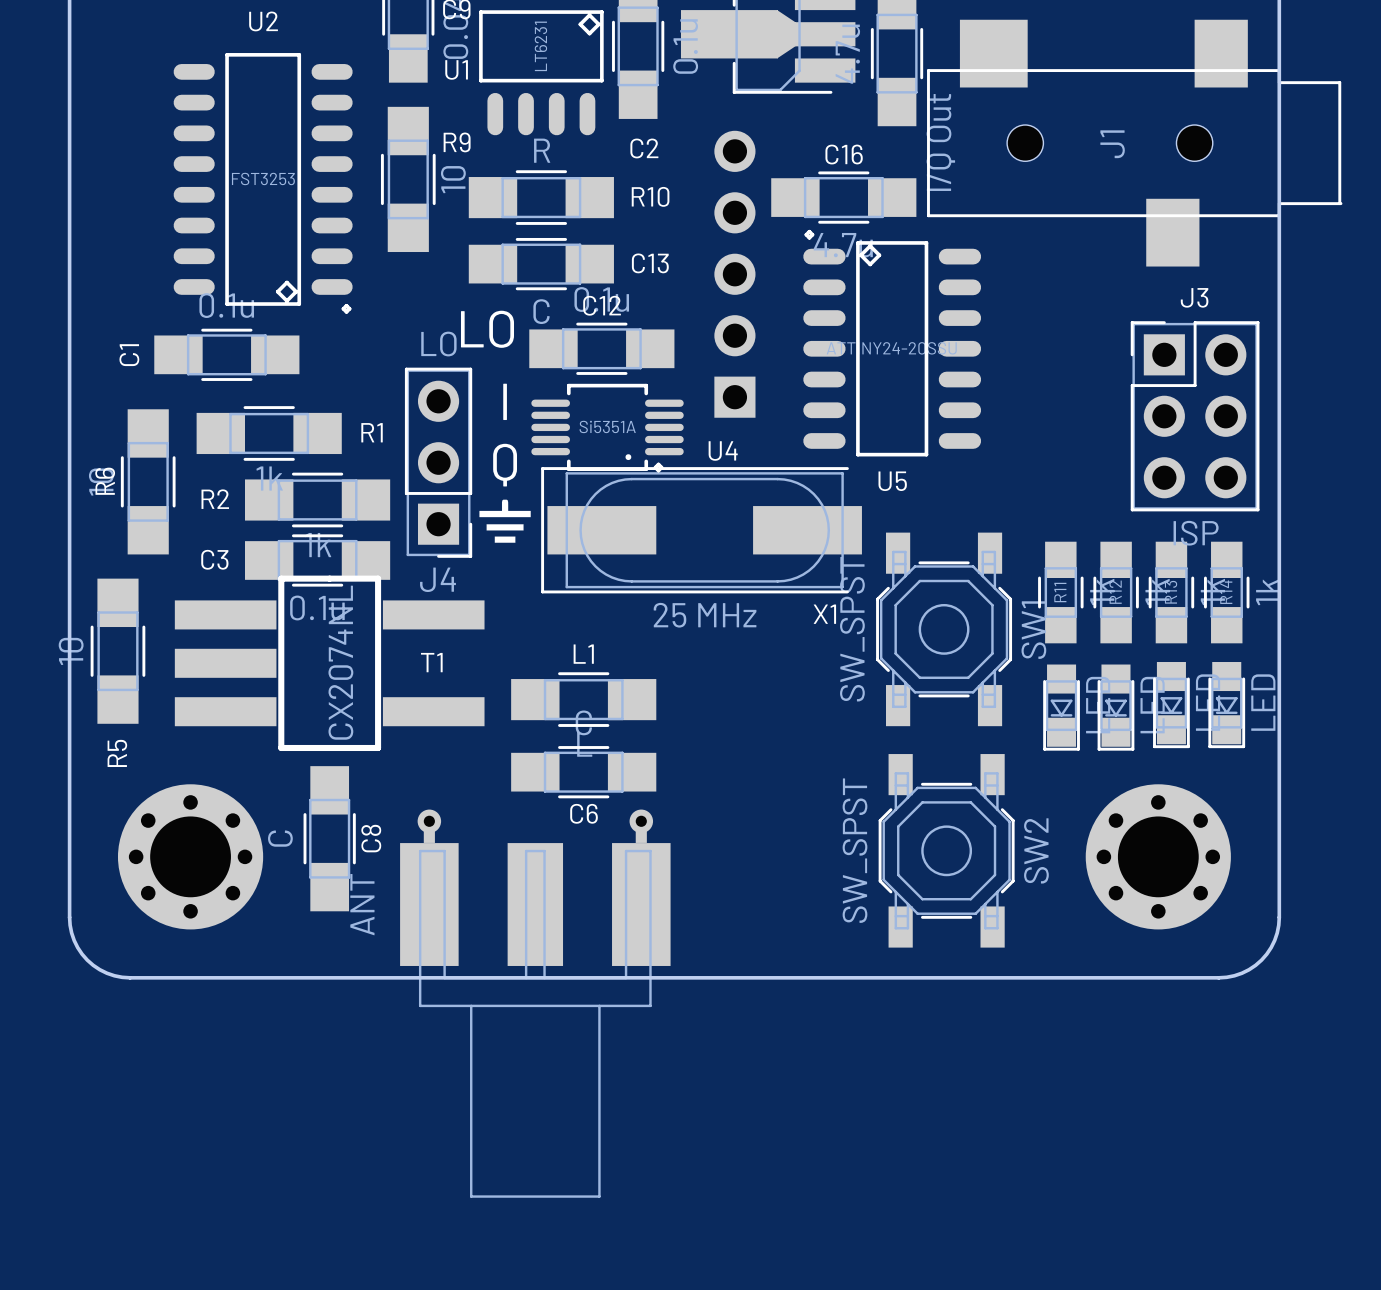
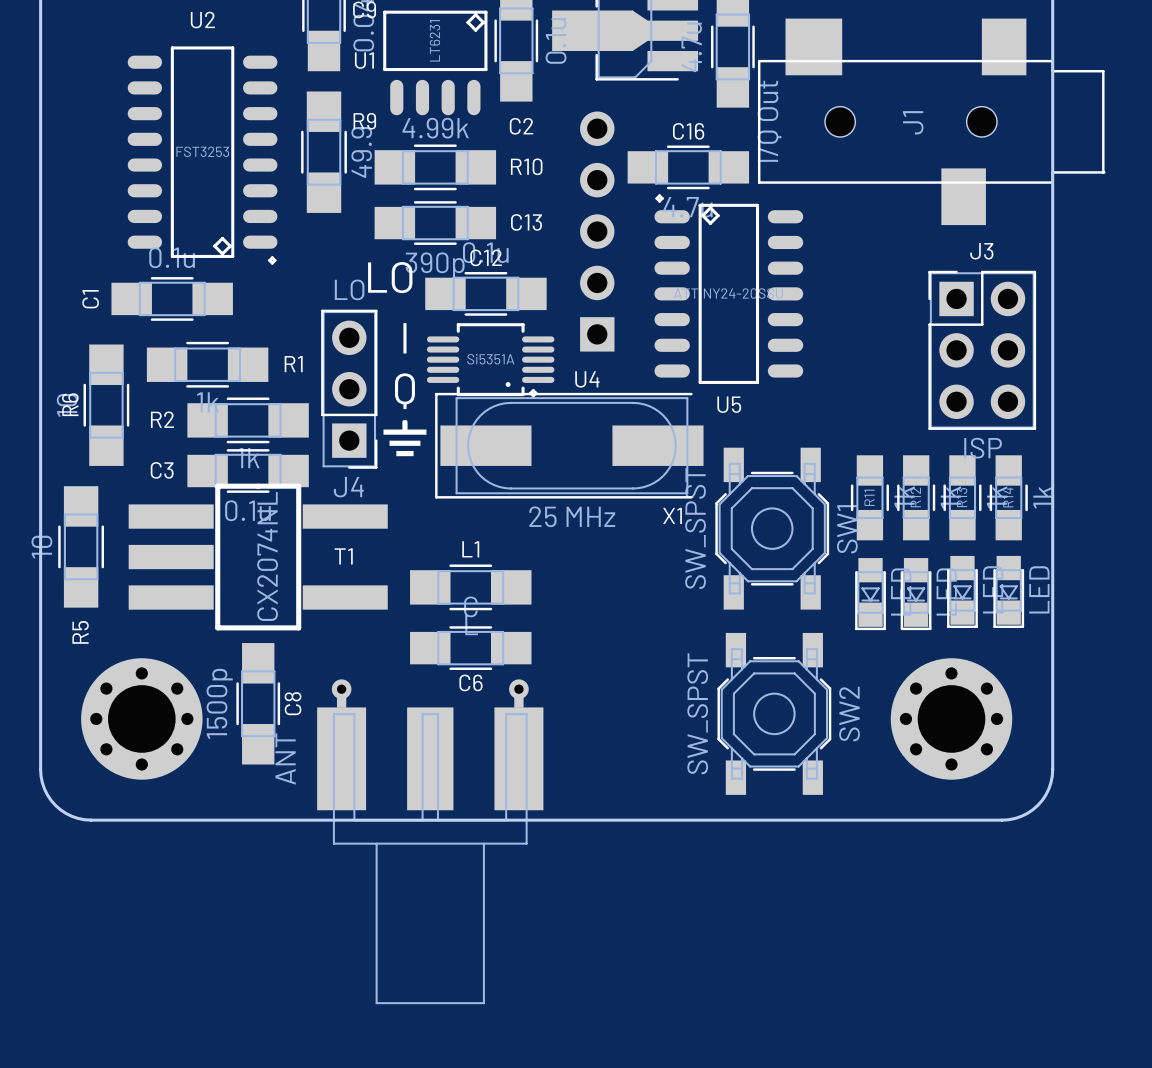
R10 value: R (542, 150) -> 4.99k (435, 128)
R9 value: 10 (453, 179) -> 49.9 (361, 152)
C13 value: C (541, 311) -> 390p (435, 265)
C8 value: C (280, 838) -> 1500p (219, 703)

